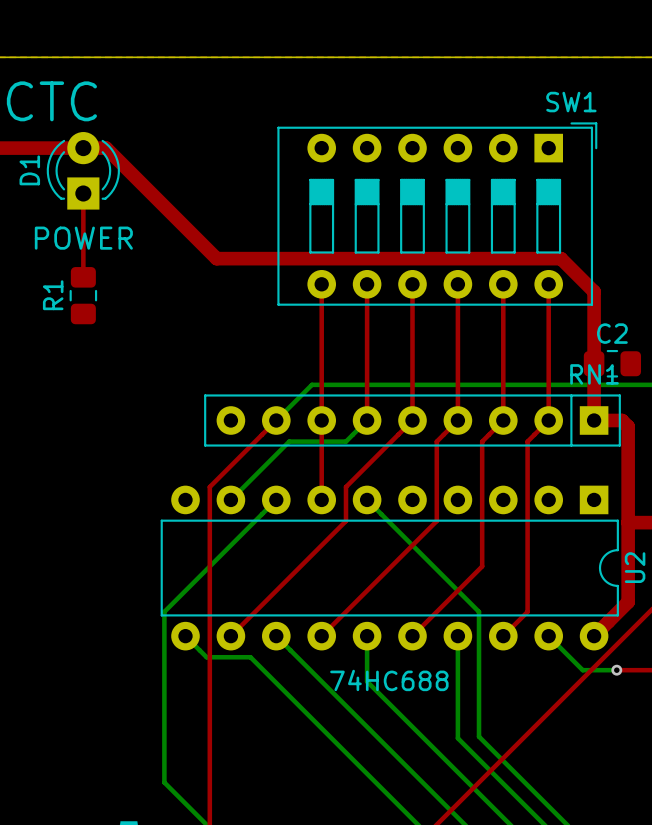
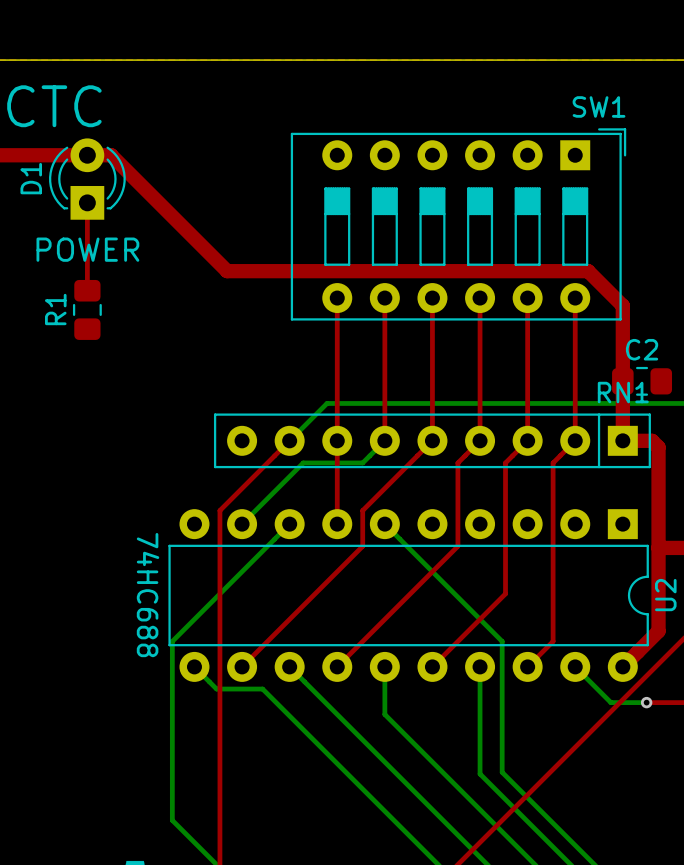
text rotation: 0° (389, 680) -> 90° clockwise (148, 595)
text position: 74HC688 (389, 680) -> 74HC688 (148, 595)

